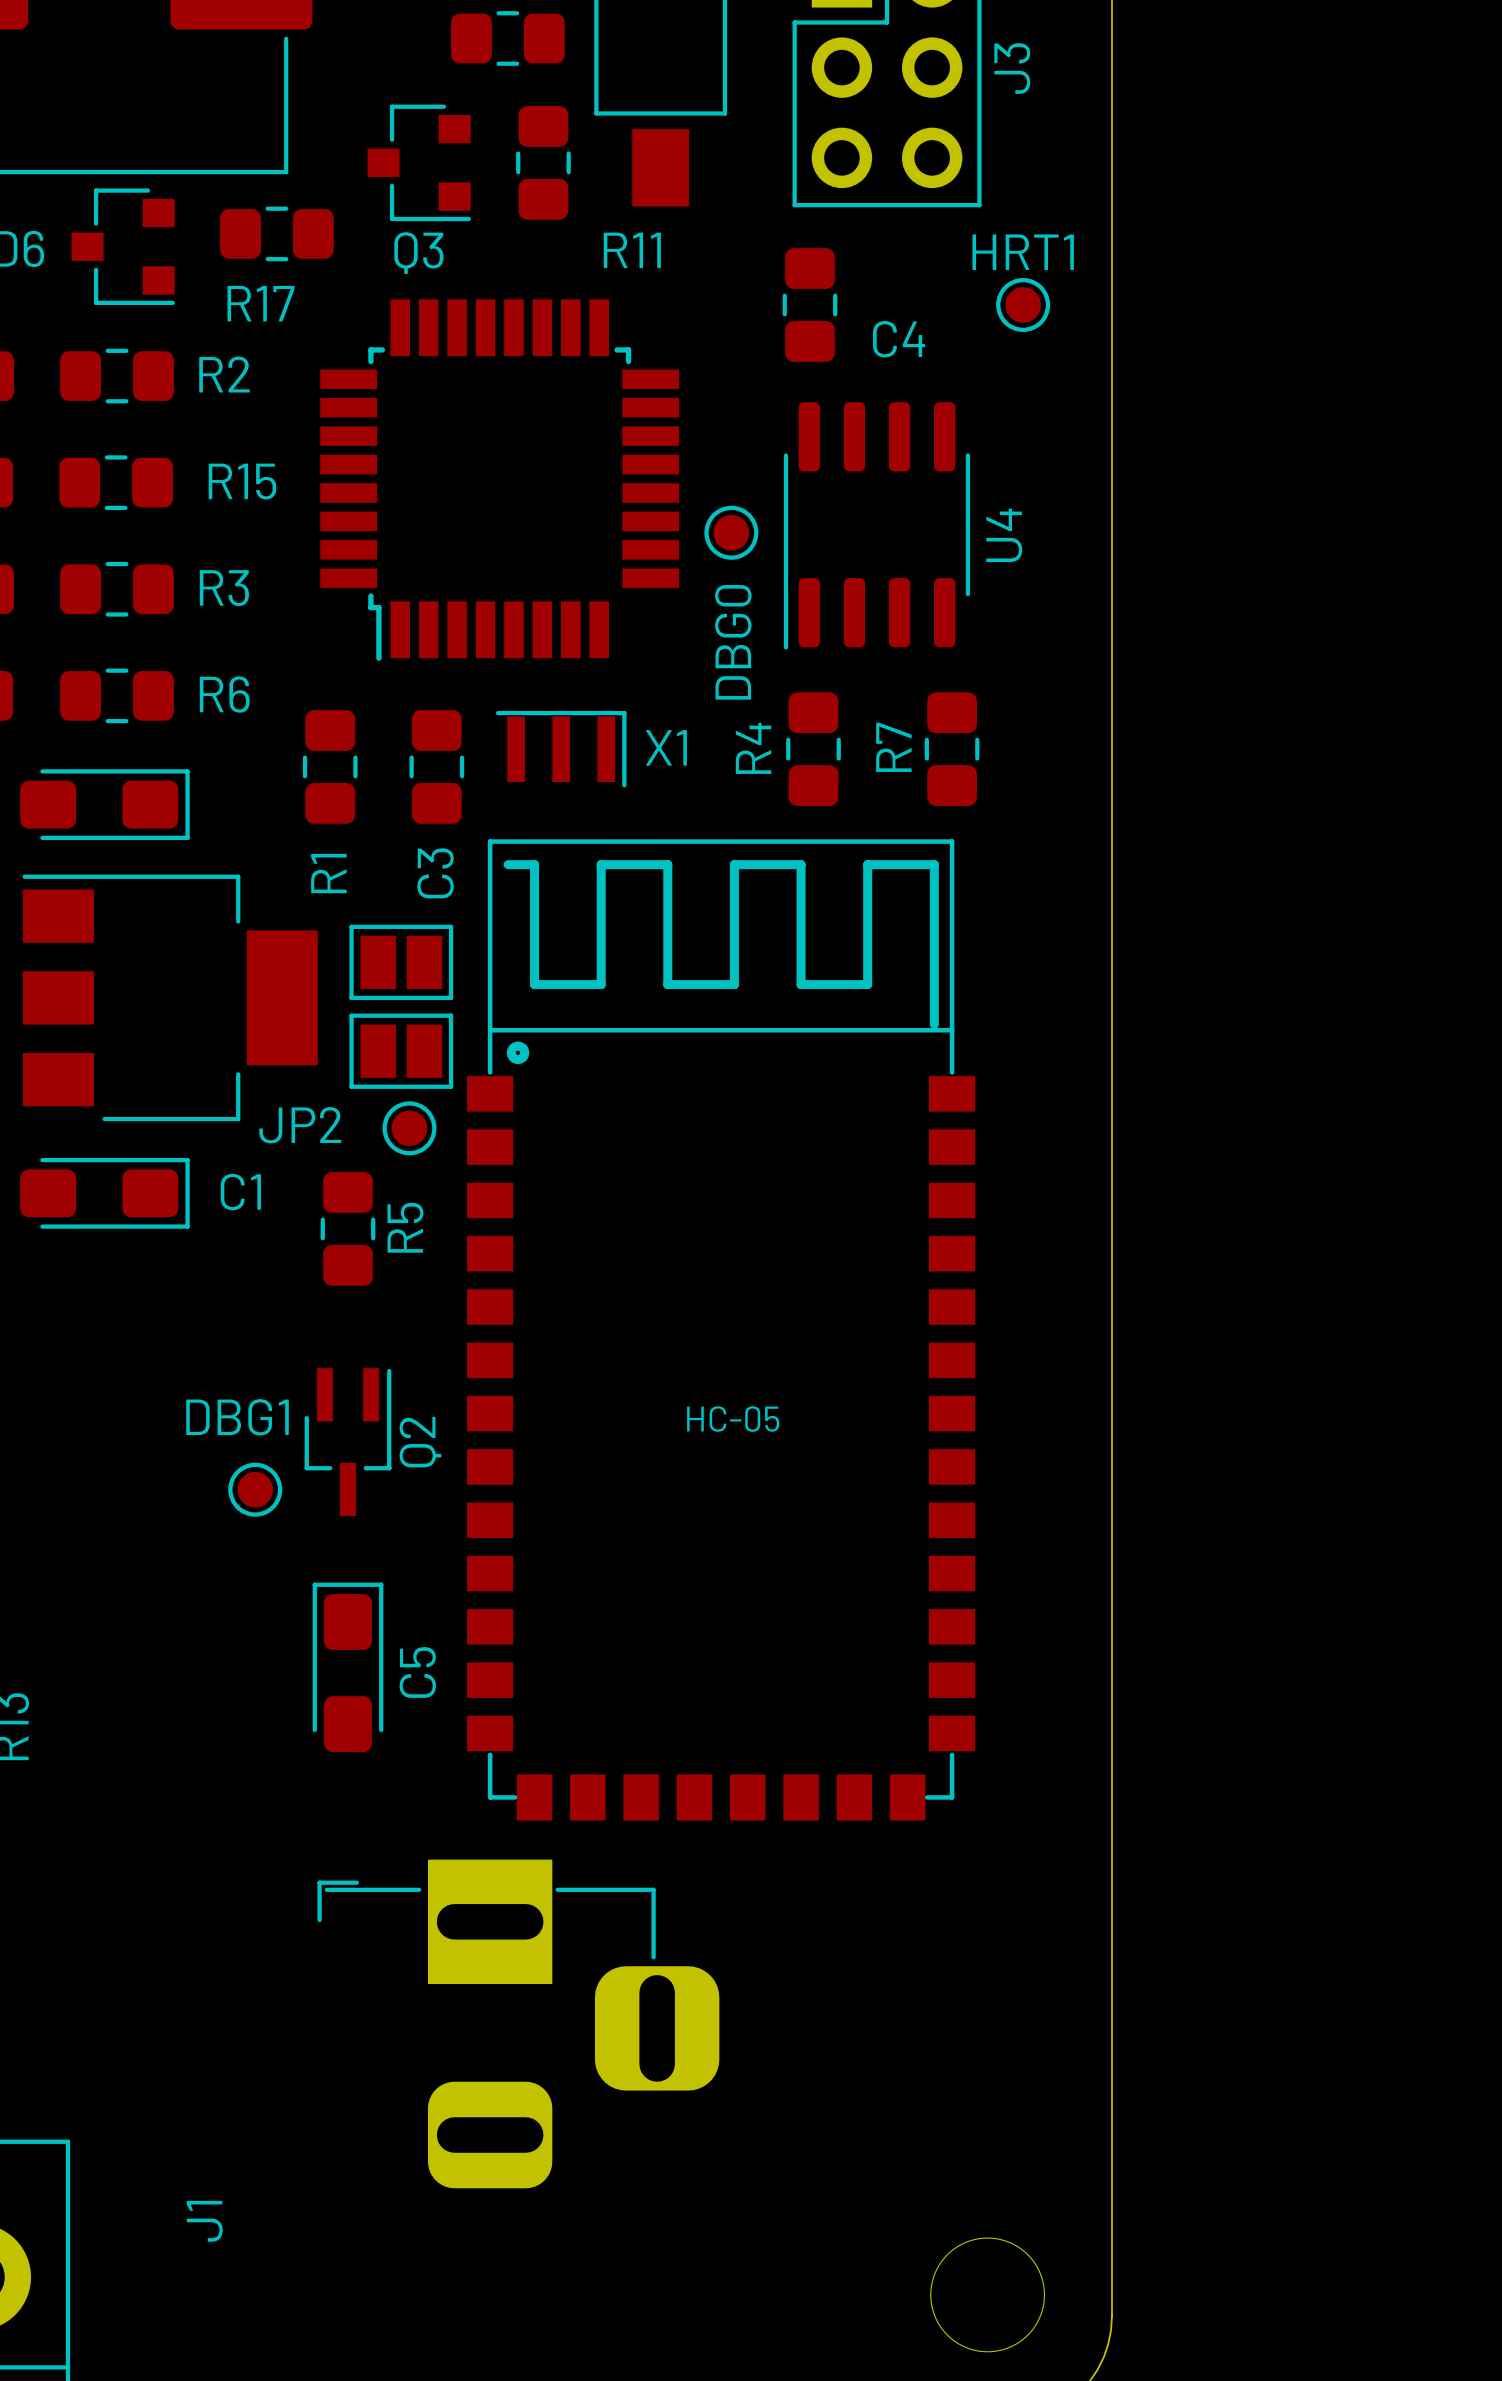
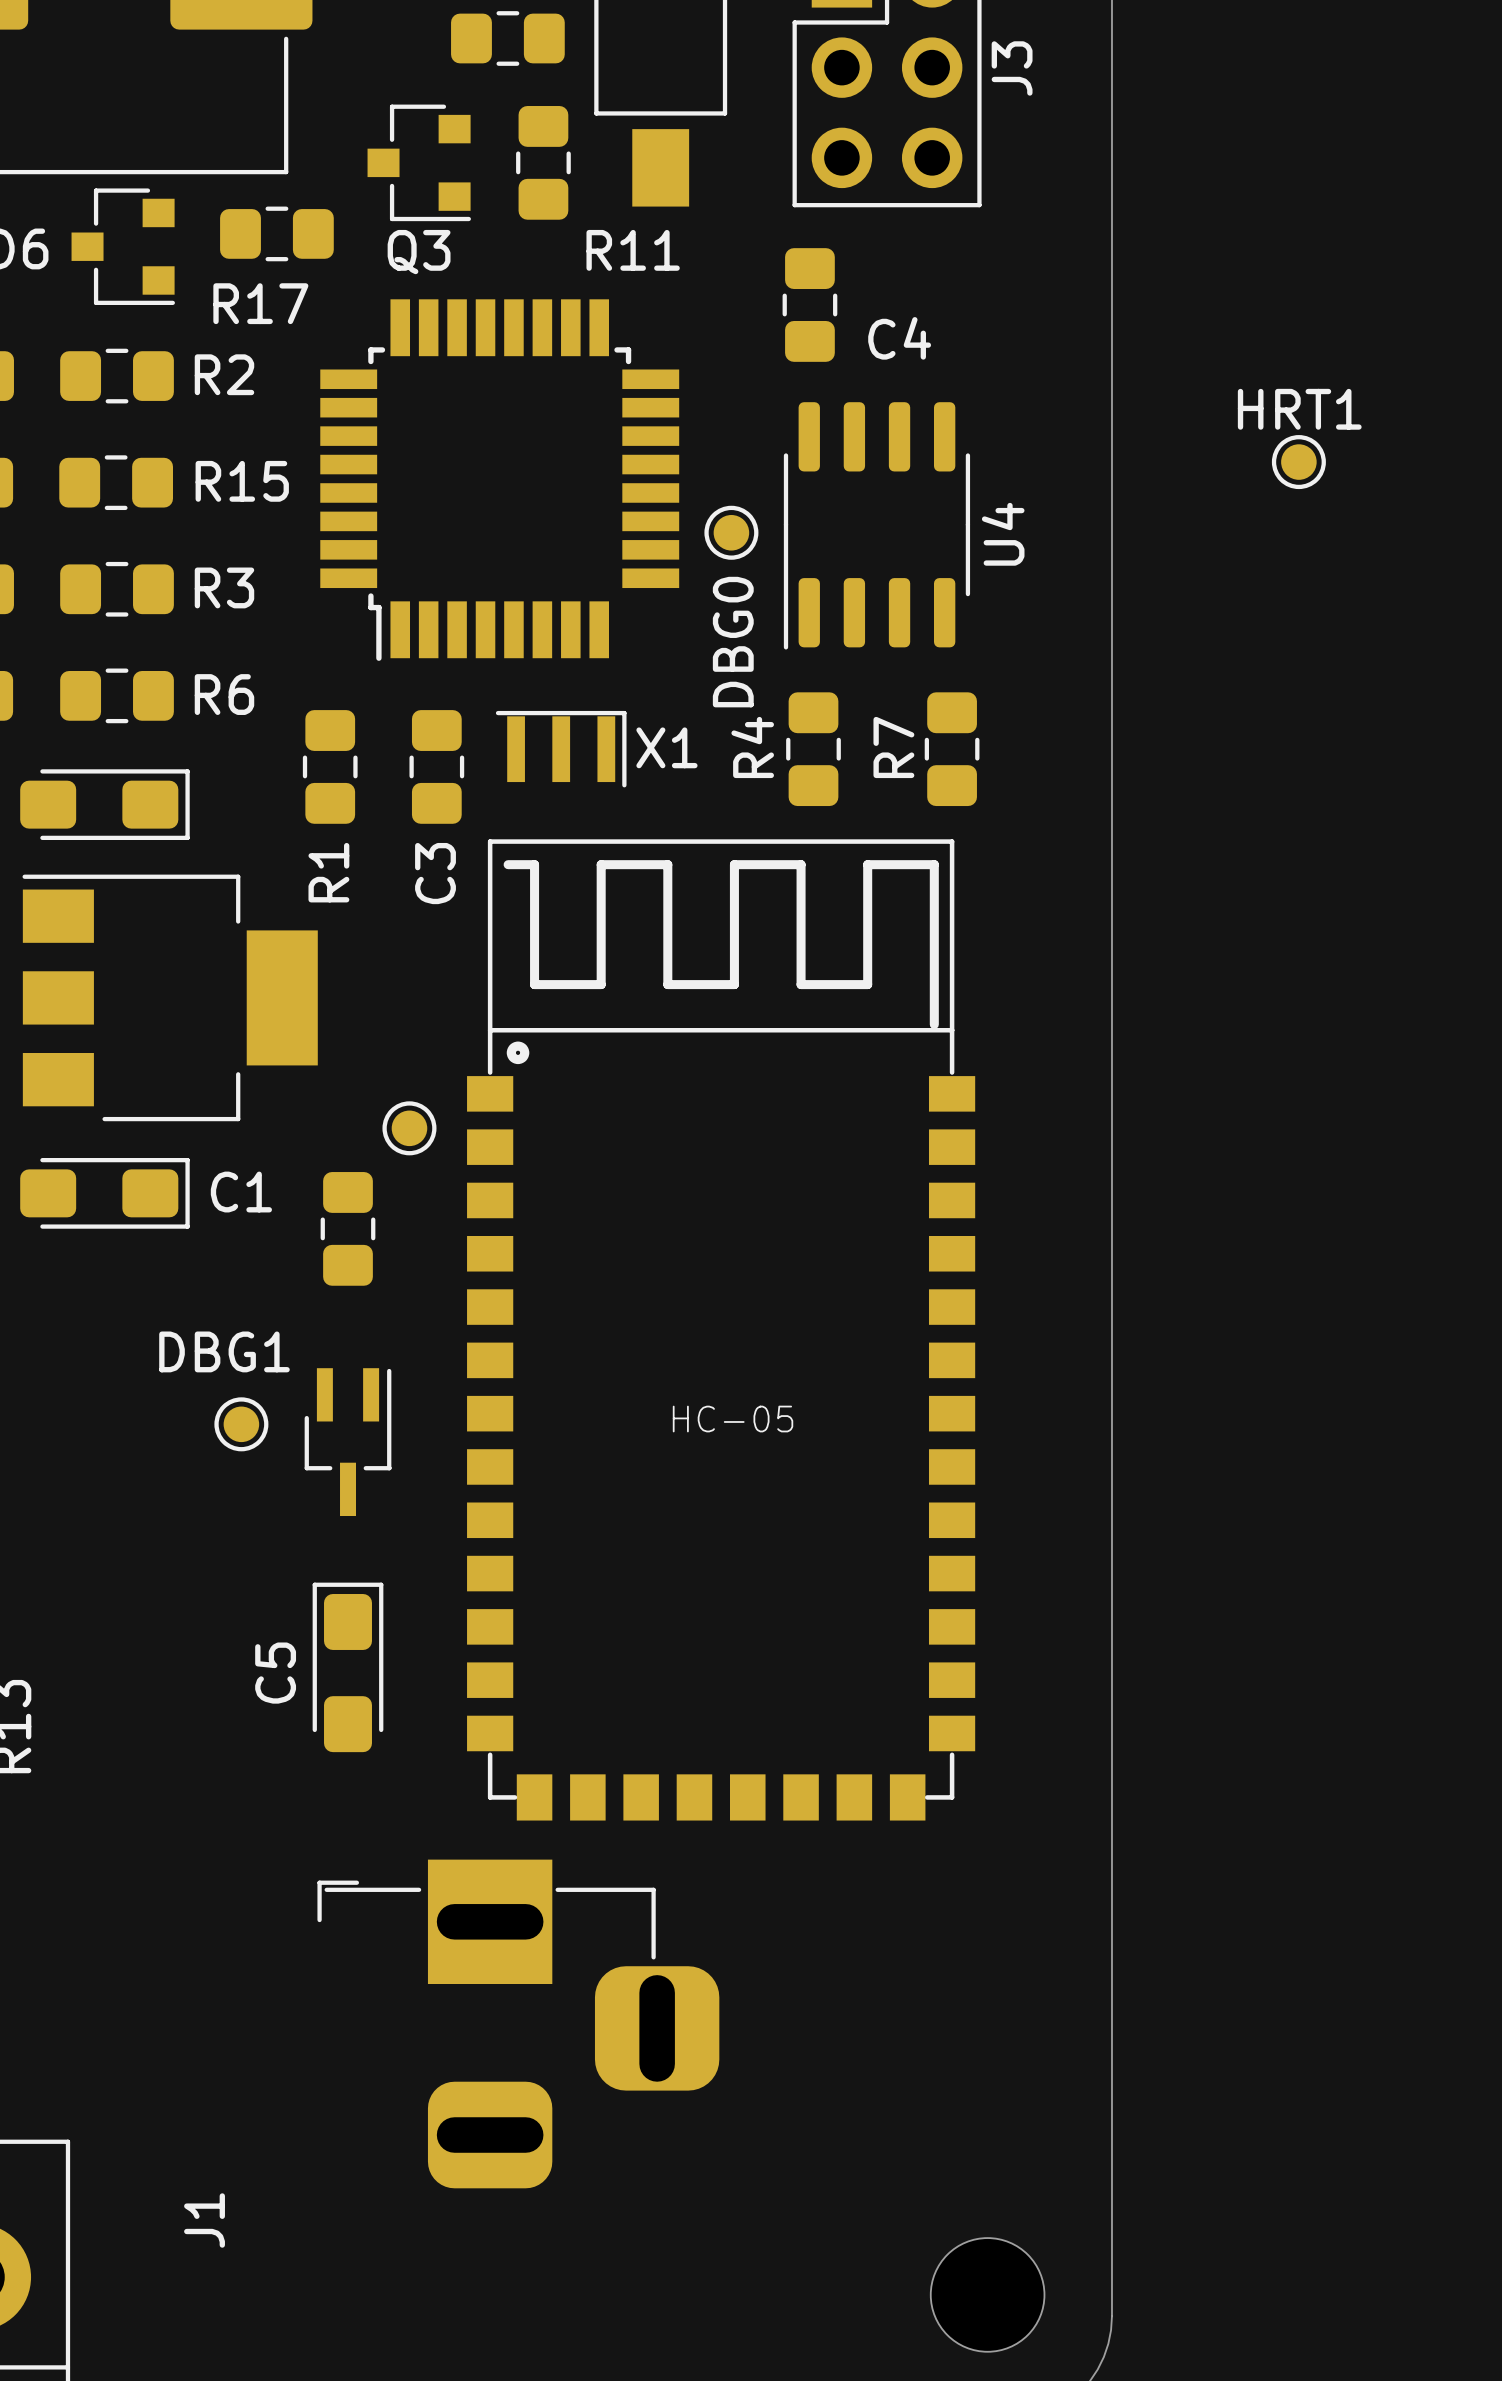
HRT1 position: (1023, 304) -> (1298, 462)
part: (401, 962) -> none
JP2: (401, 1051) -> none
R5 name: R5 (405, 1227) -> none
Q2 name: Q2 (420, 1442) -> none
DBG1 position: (255, 1489) -> (241, 1424)
C5 name position: C5 (417, 1672) -> C5 (275, 1673)

